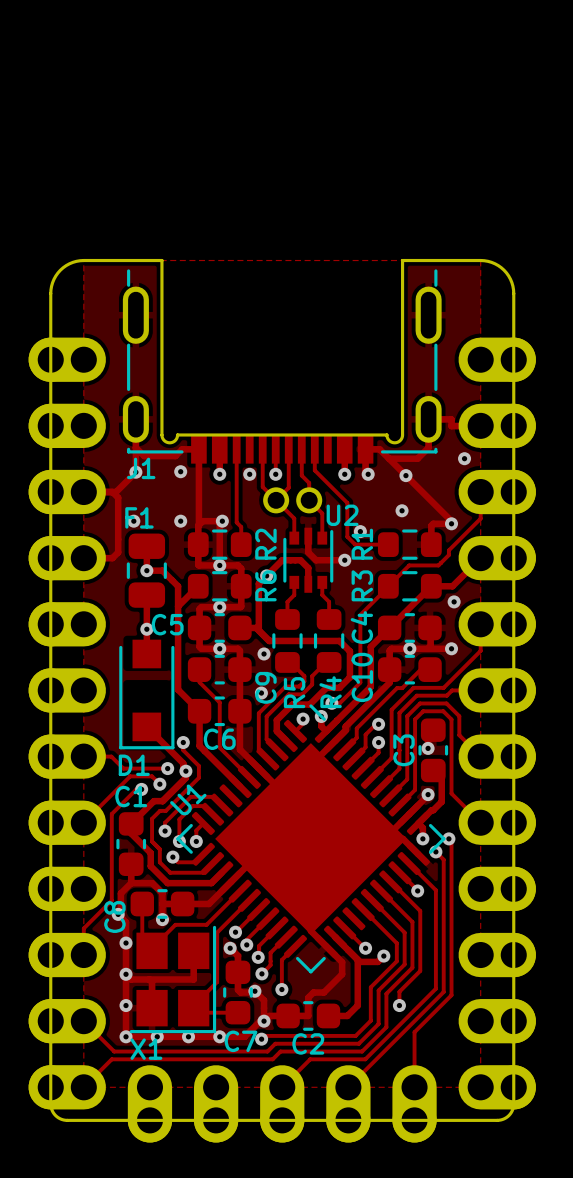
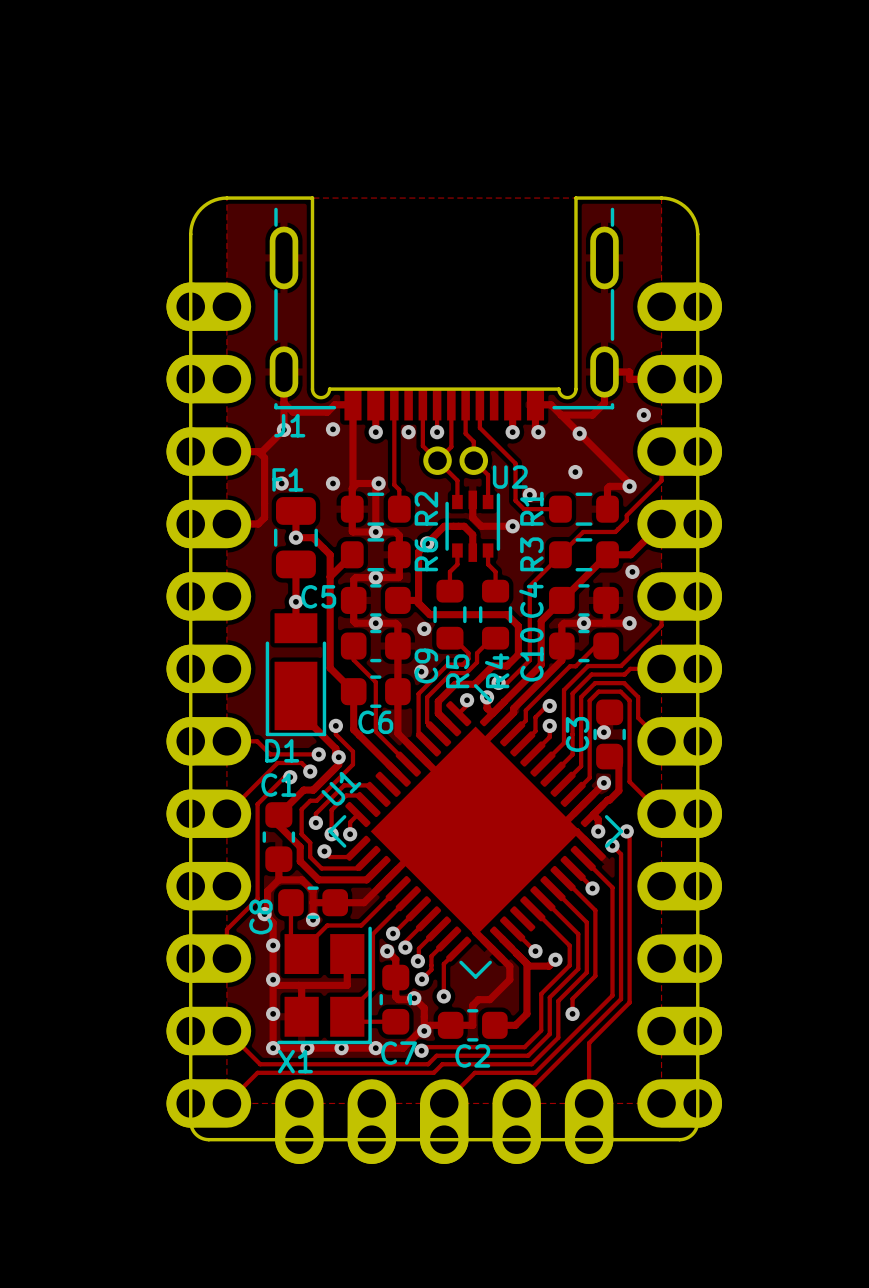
D1 footprint: [119, 639, 175, 750] -> [265, 613, 327, 737]

